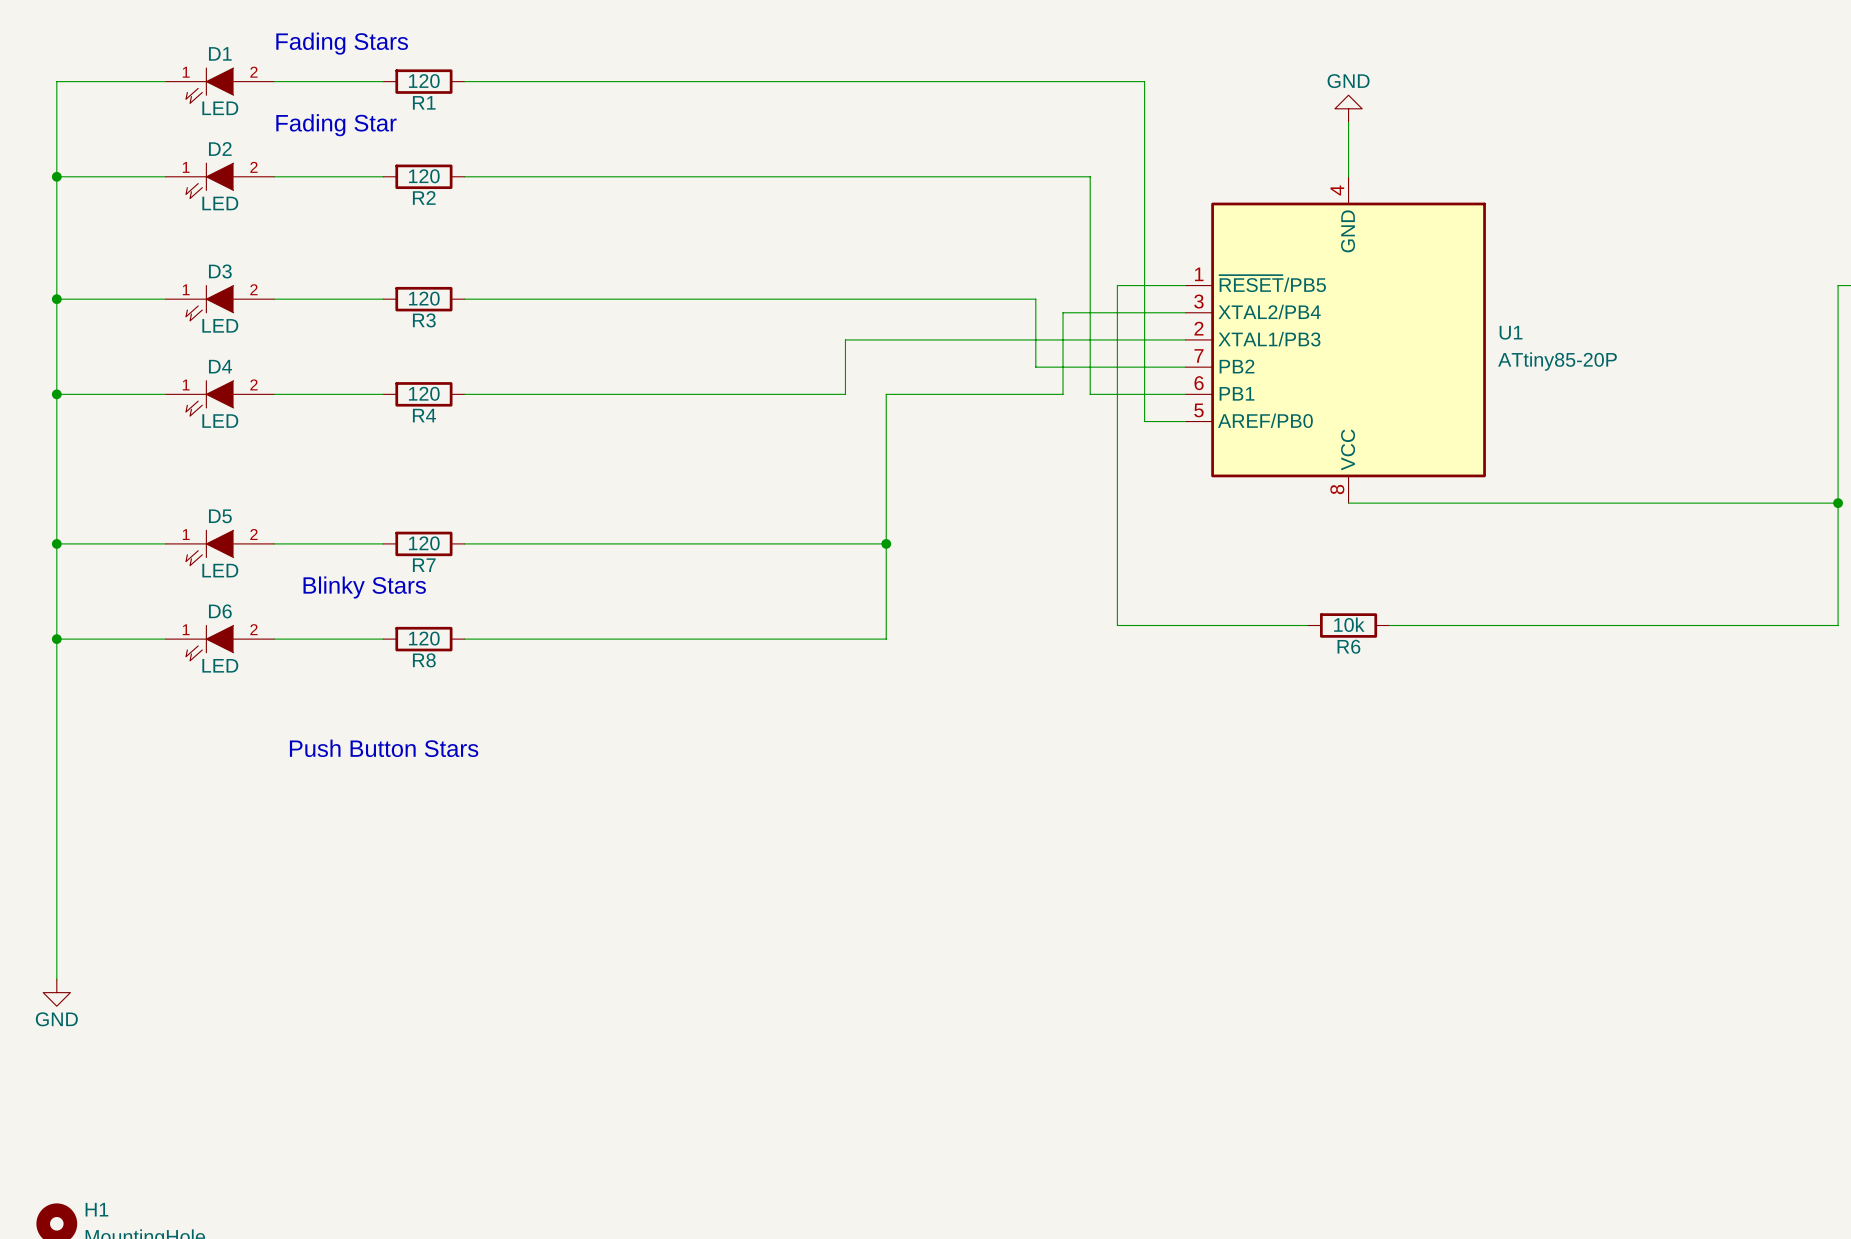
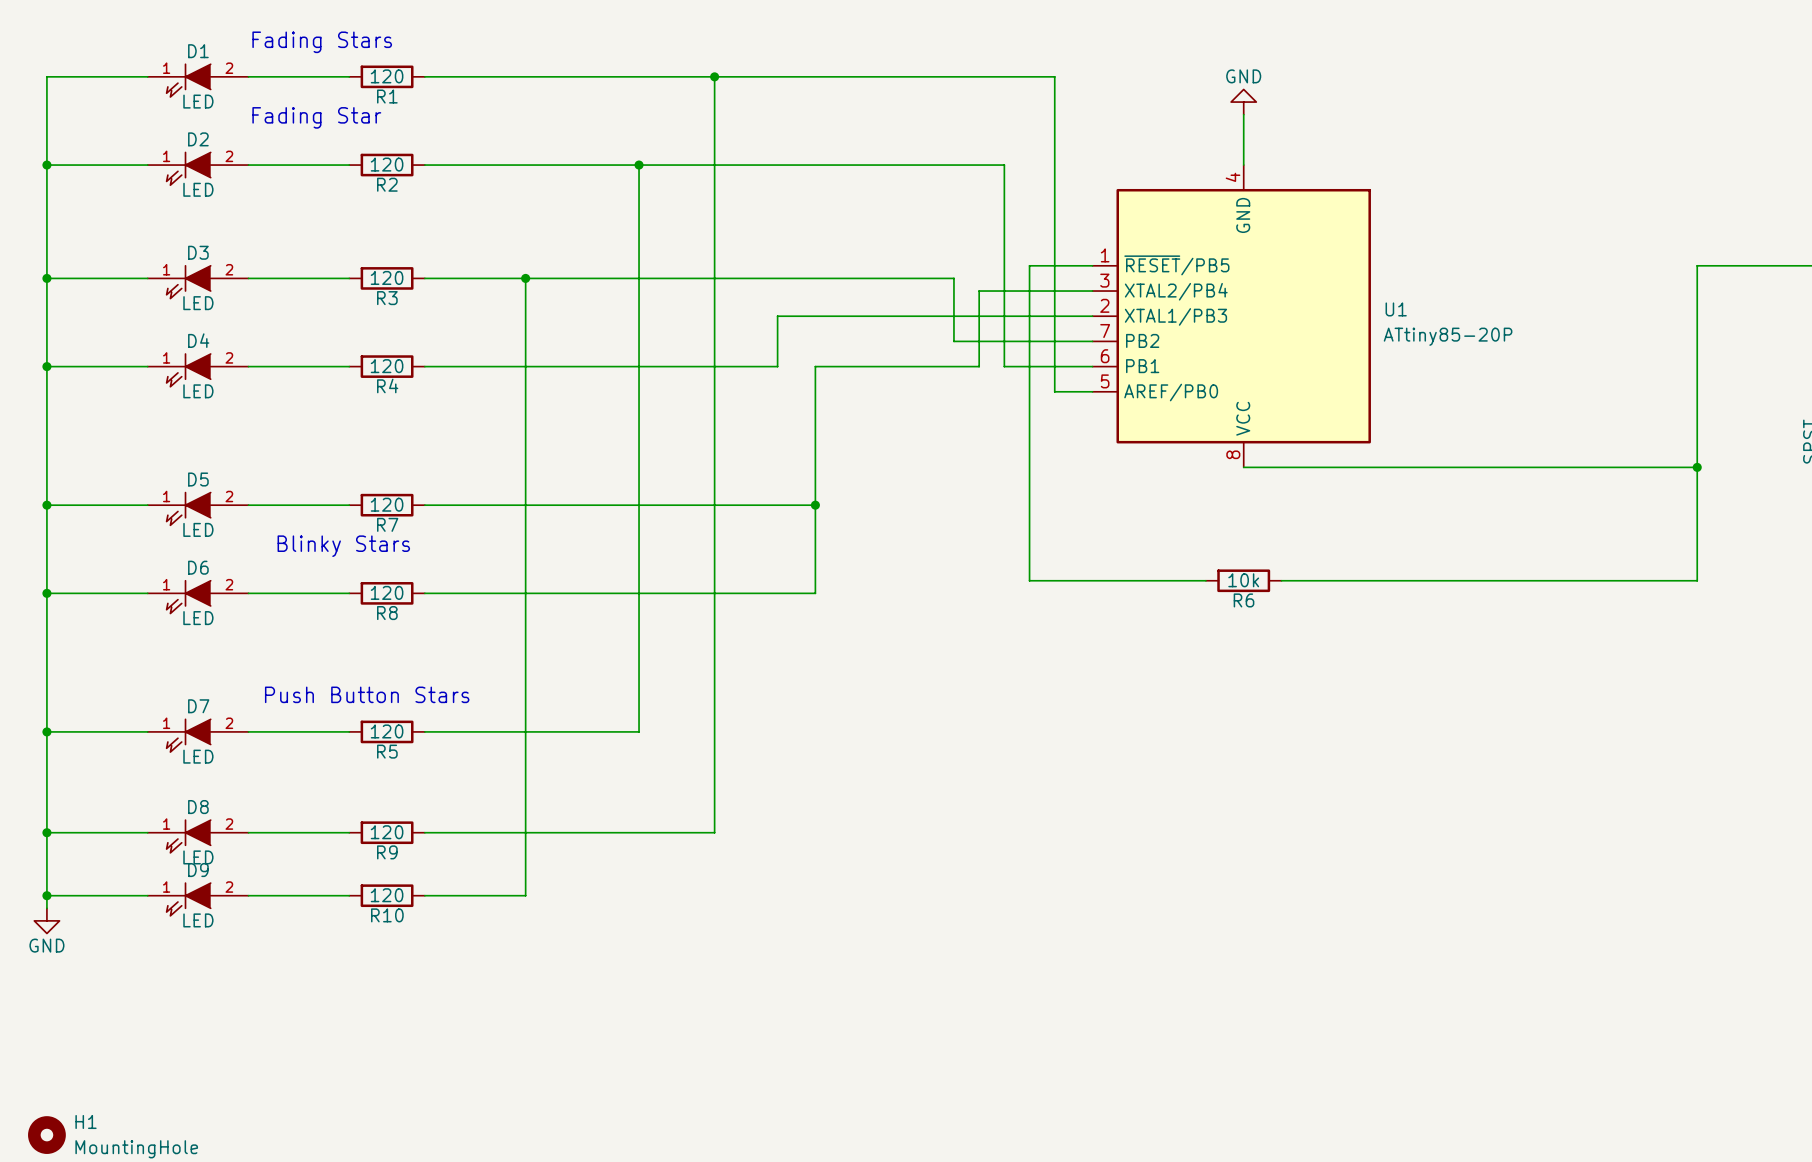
wire: none -> (714, 76) (714, 832) (424, 832)
junction: none -> (714, 76)
wire: none -> (639, 165) (639, 731) (424, 731)
junction: none -> (639, 165)
wire: none -> (525, 278) (525, 895) (424, 895)
junction: none -> (525, 278)
wire: none -> (46, 731) (147, 731)
junction: none -> (46, 731)
wire: none -> (248, 731) (349, 731)
R5: none -> 120 (387, 731)
D7: none -> LED (198, 735)
wire: none -> (46, 832) (147, 832)
junction: none -> (46, 832)
wire: none -> (248, 832) (349, 832)
R9: none -> 120 (387, 832)
D8: none -> LED (198, 836)
wire: none -> (46, 895) (147, 895)
junction: none -> (46, 895)
wire: none -> (248, 895) (349, 895)
R10: none -> 120 (387, 895)
D9: none -> LED (198, 899)

